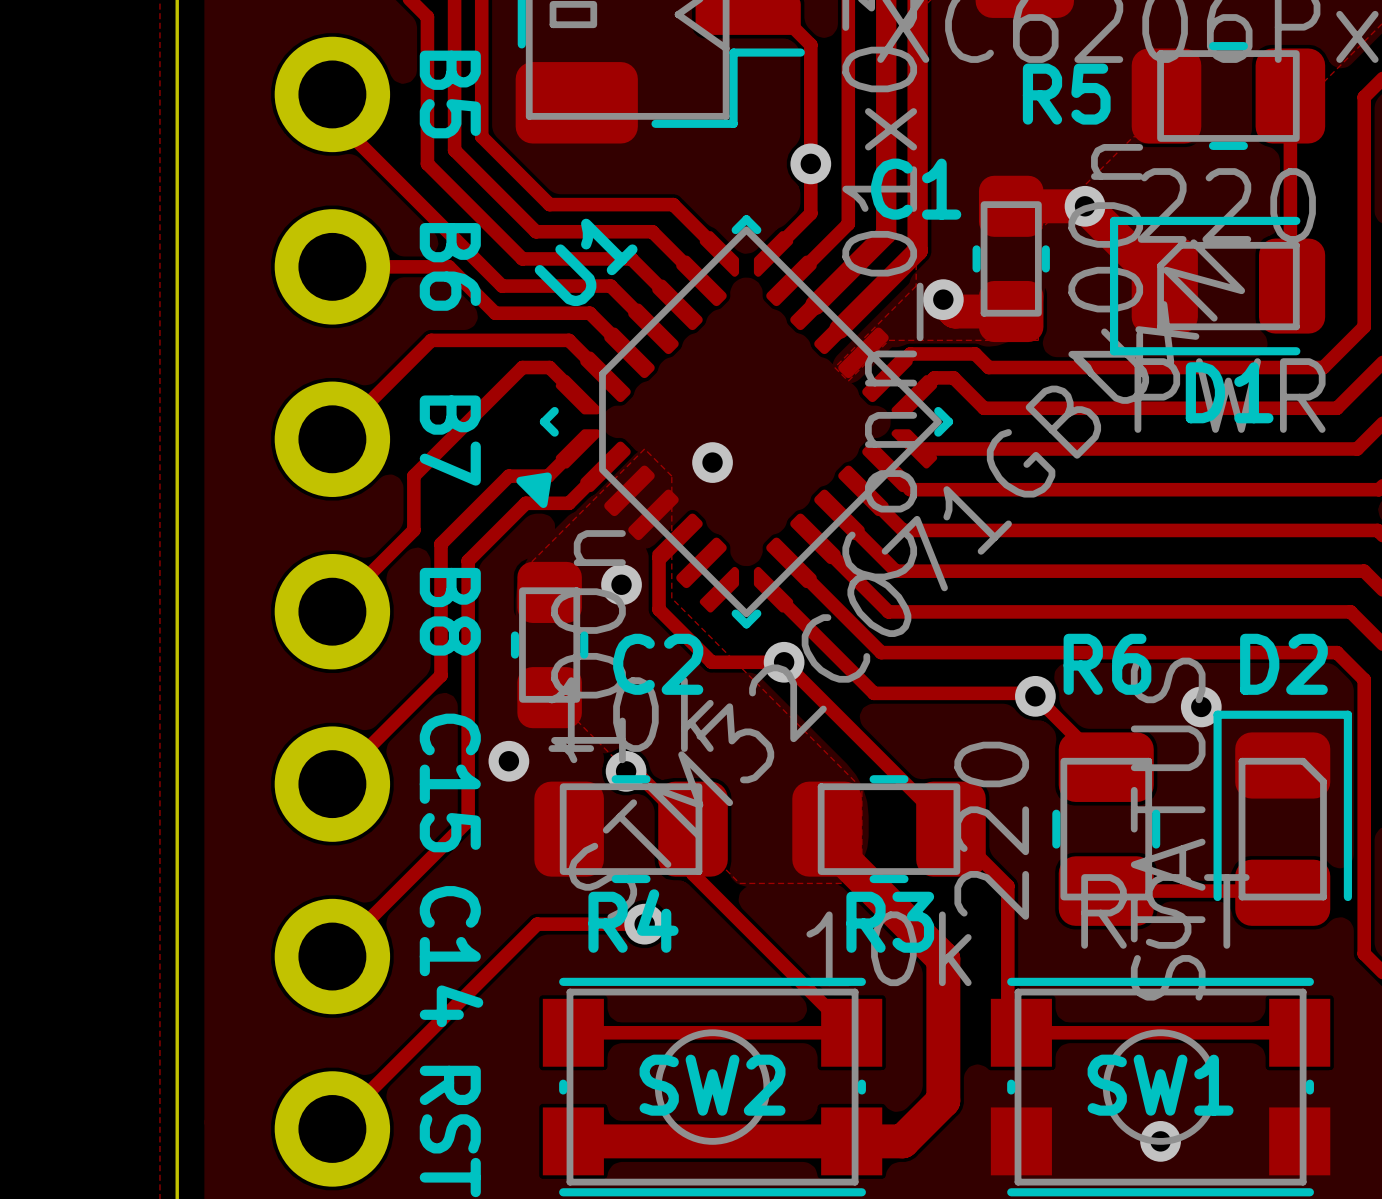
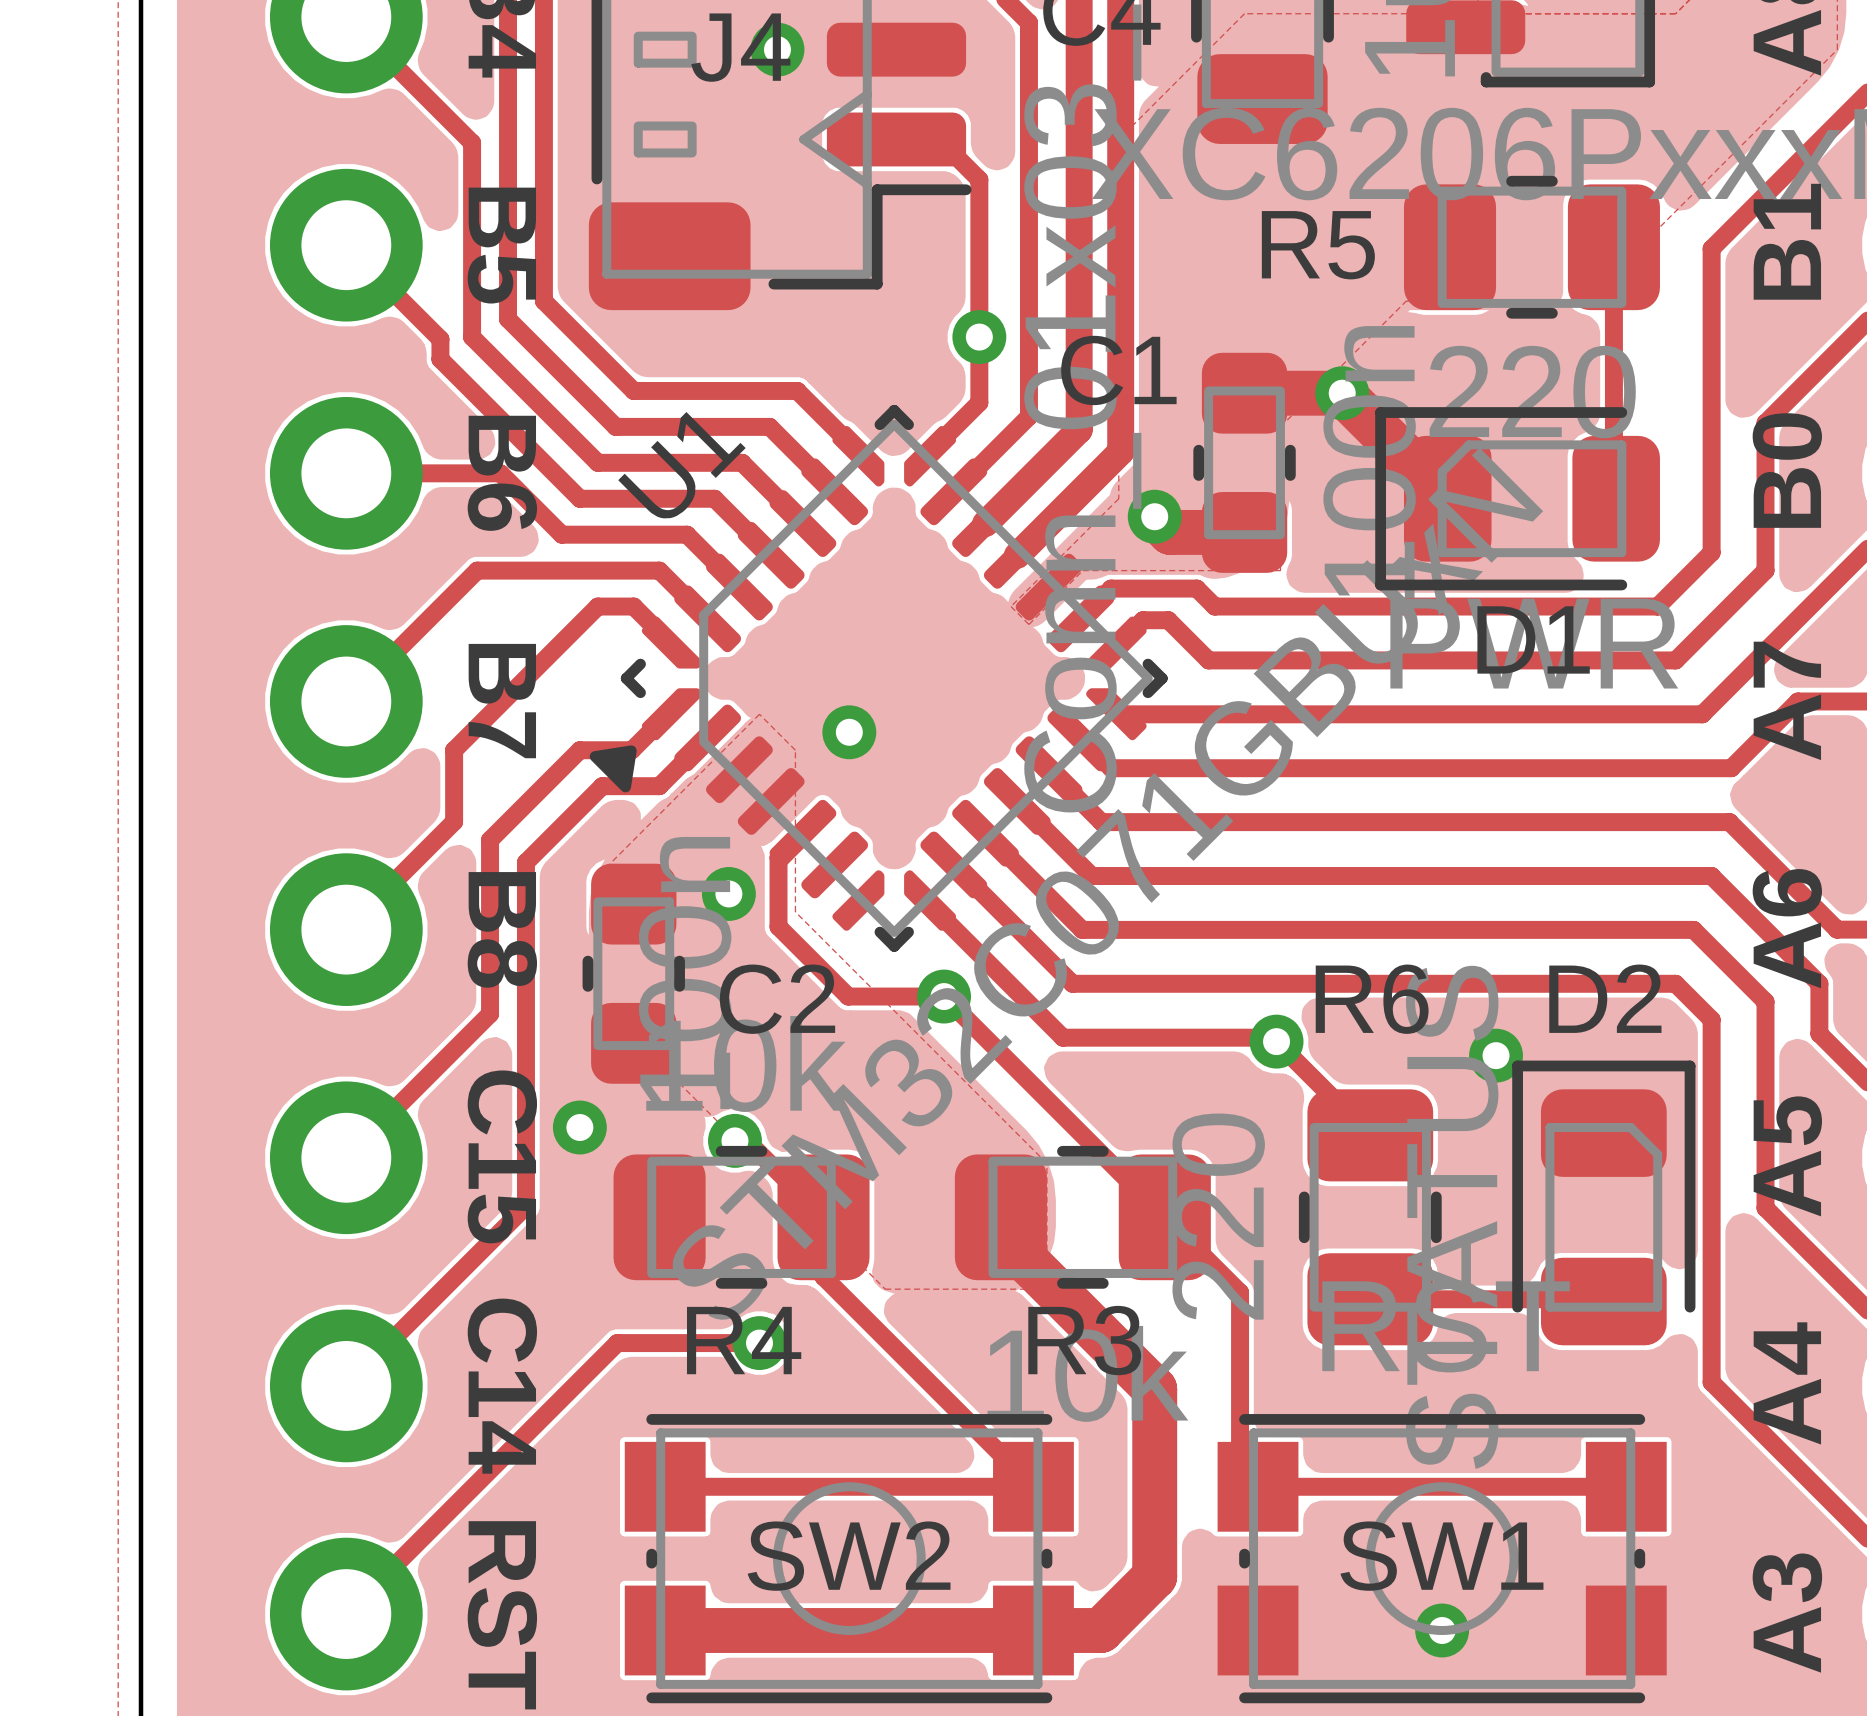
track: (332, 94) (332, 116) (502, 286) (508, 286) -> (346, 245) (440, 339) (440, 359) (579, 498)

